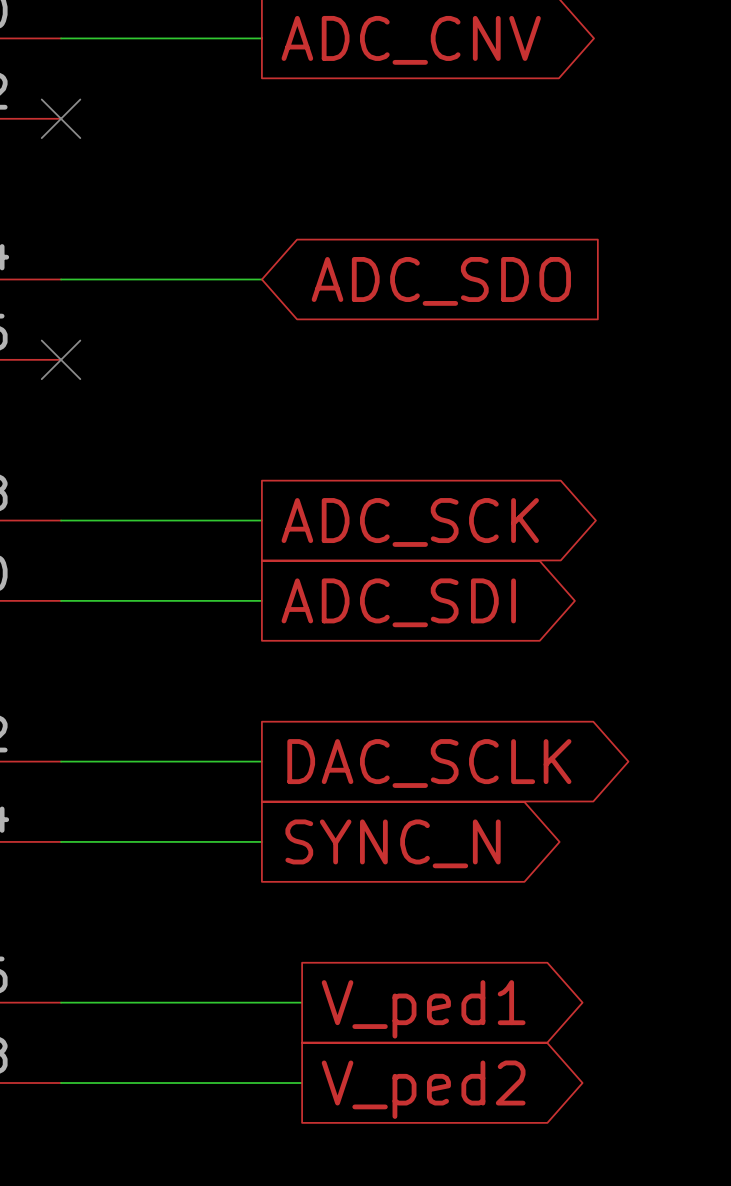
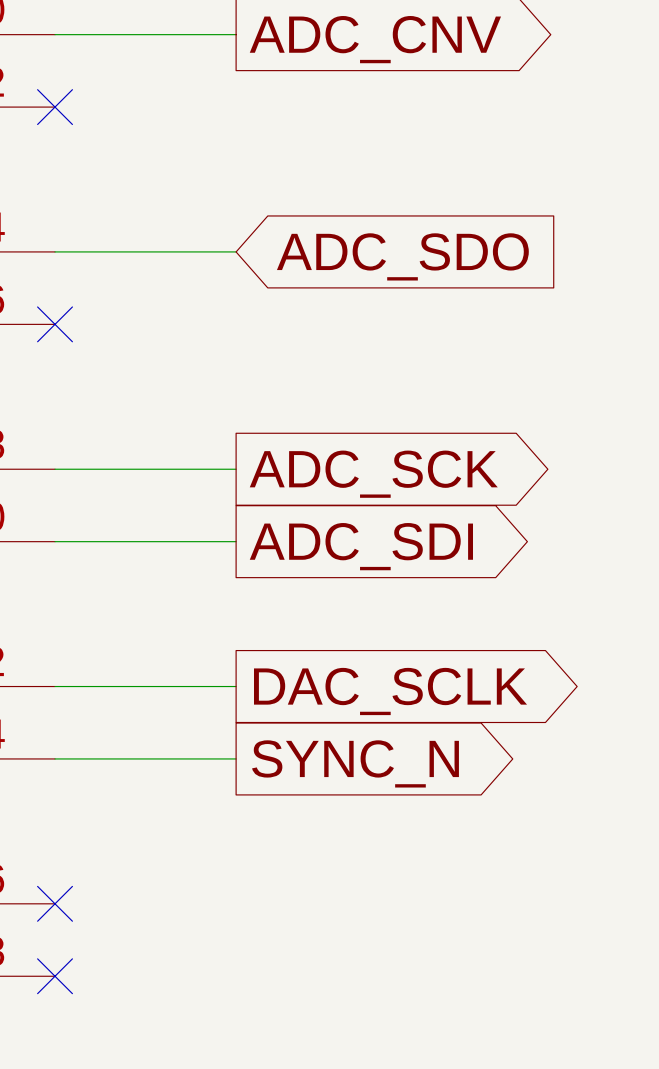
wire: (61, 1002) (302, 1002) -> none
no-connect mark: none -> (55, 903)
global label: V_ped1 (423, 1009) -> none
wire: (61, 1083) (302, 1083) -> none
no-connect mark: none -> (55, 976)
global label: V_ped2 (423, 1089) -> none

